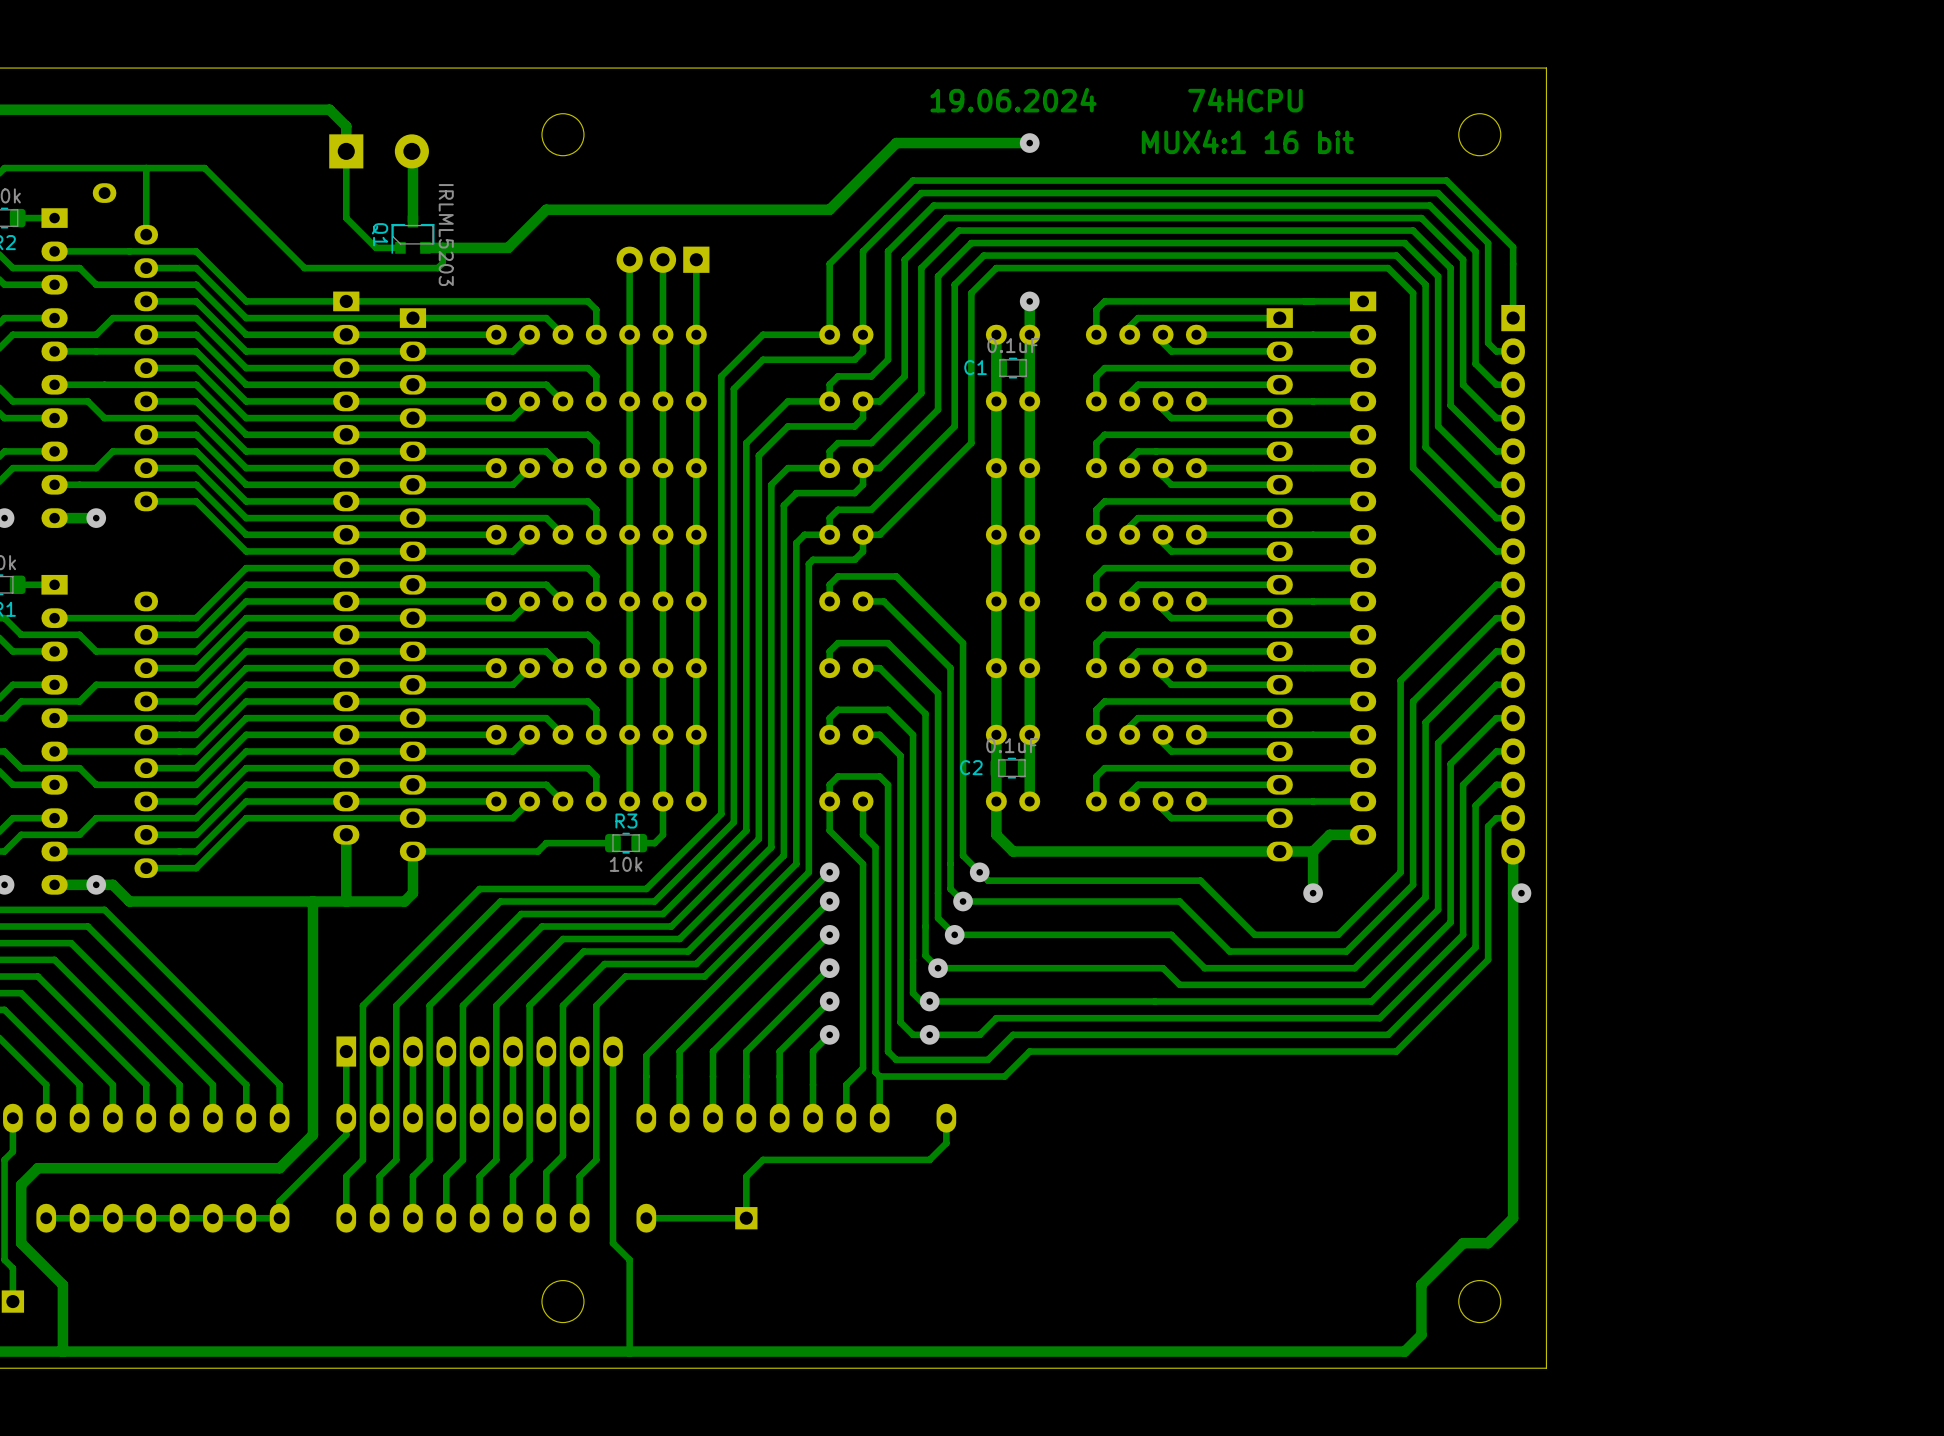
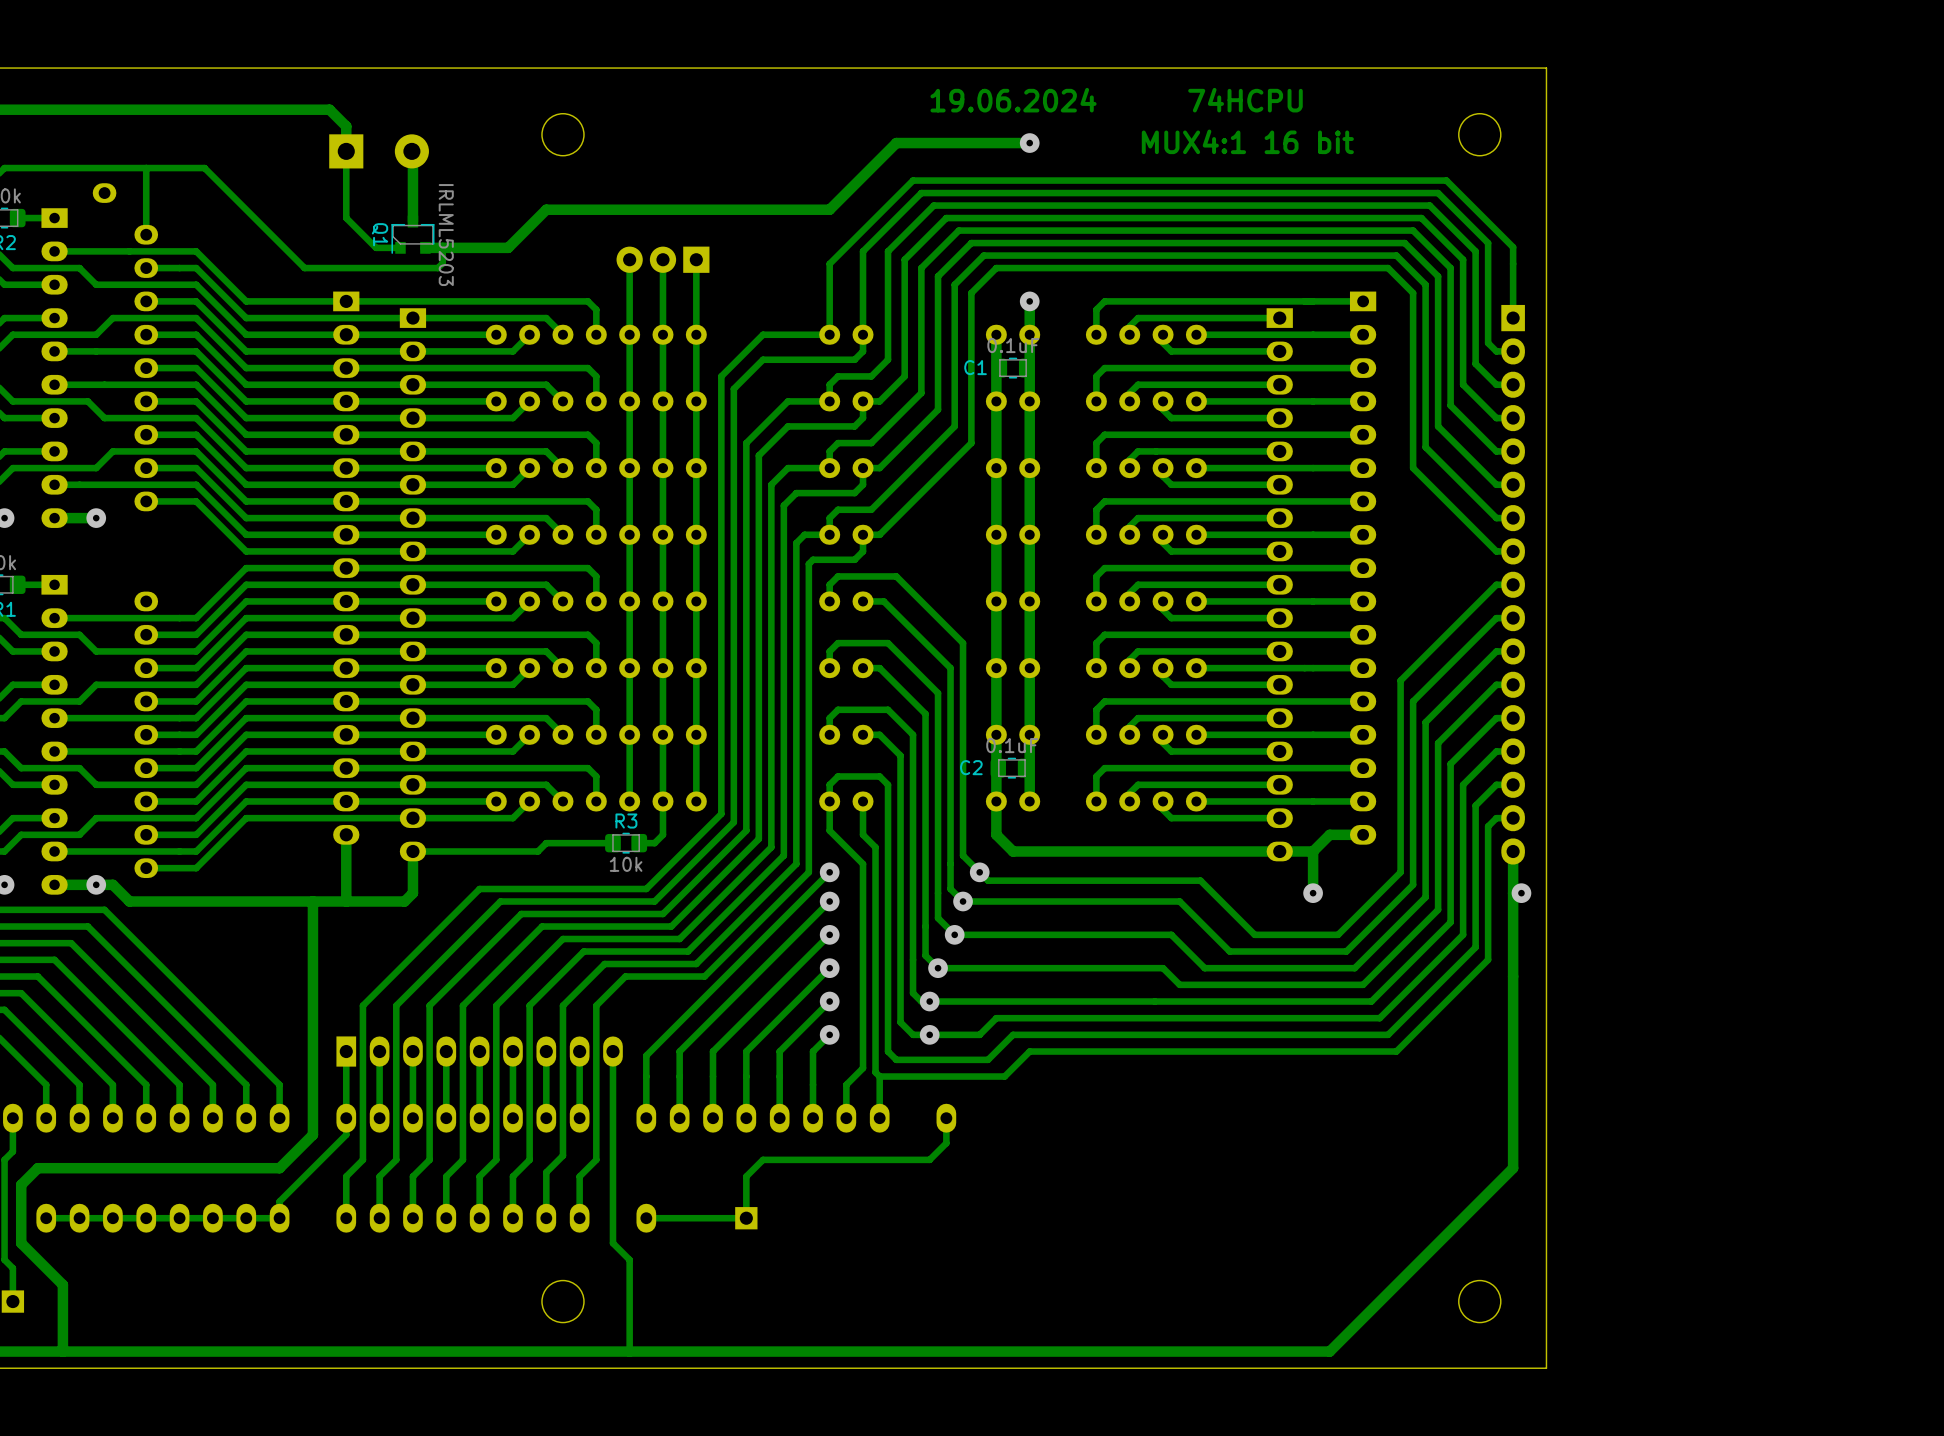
track: (1513, 1168) (1513, 1218) (1488, 1243) (1463, 1243) (1421, 1284) (1421, 1334) (1404, 1351) (1329, 1351) -> (1513, 1168) (1329, 1351)

